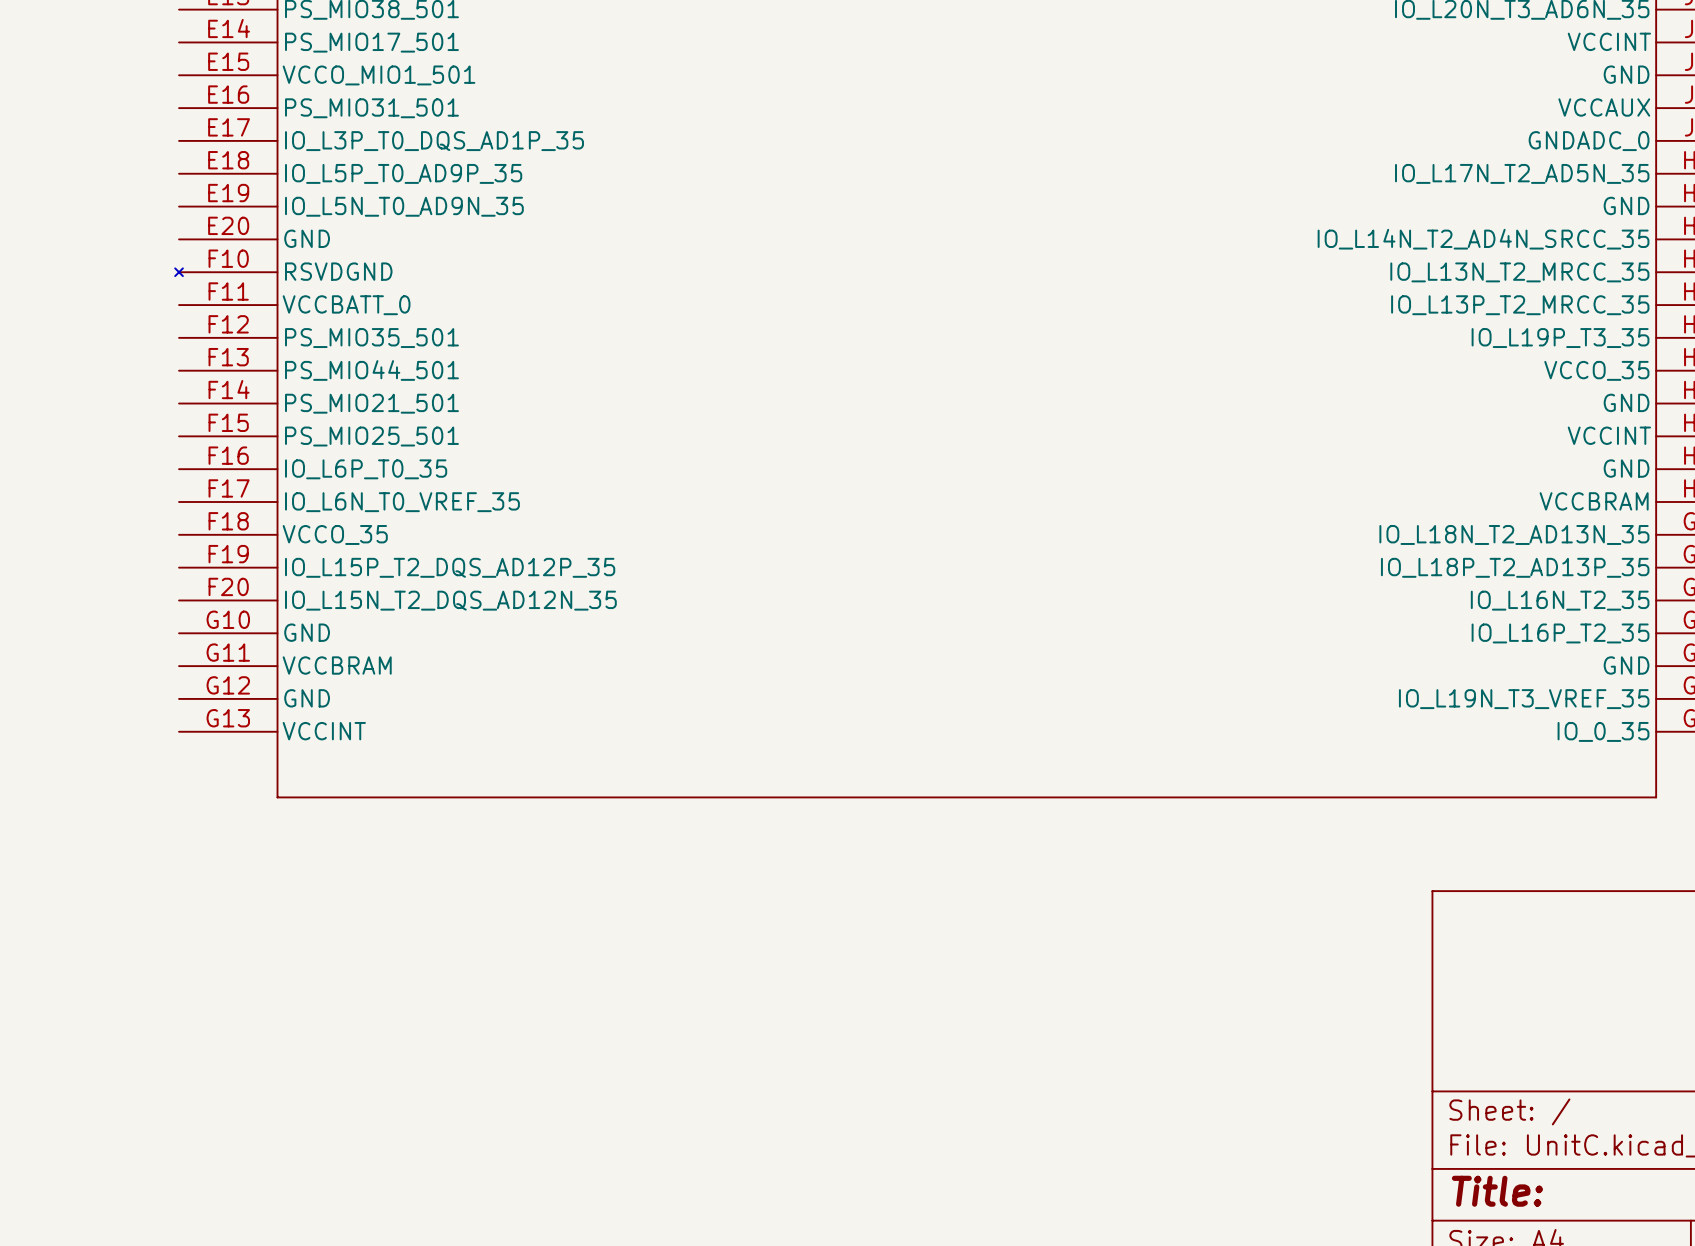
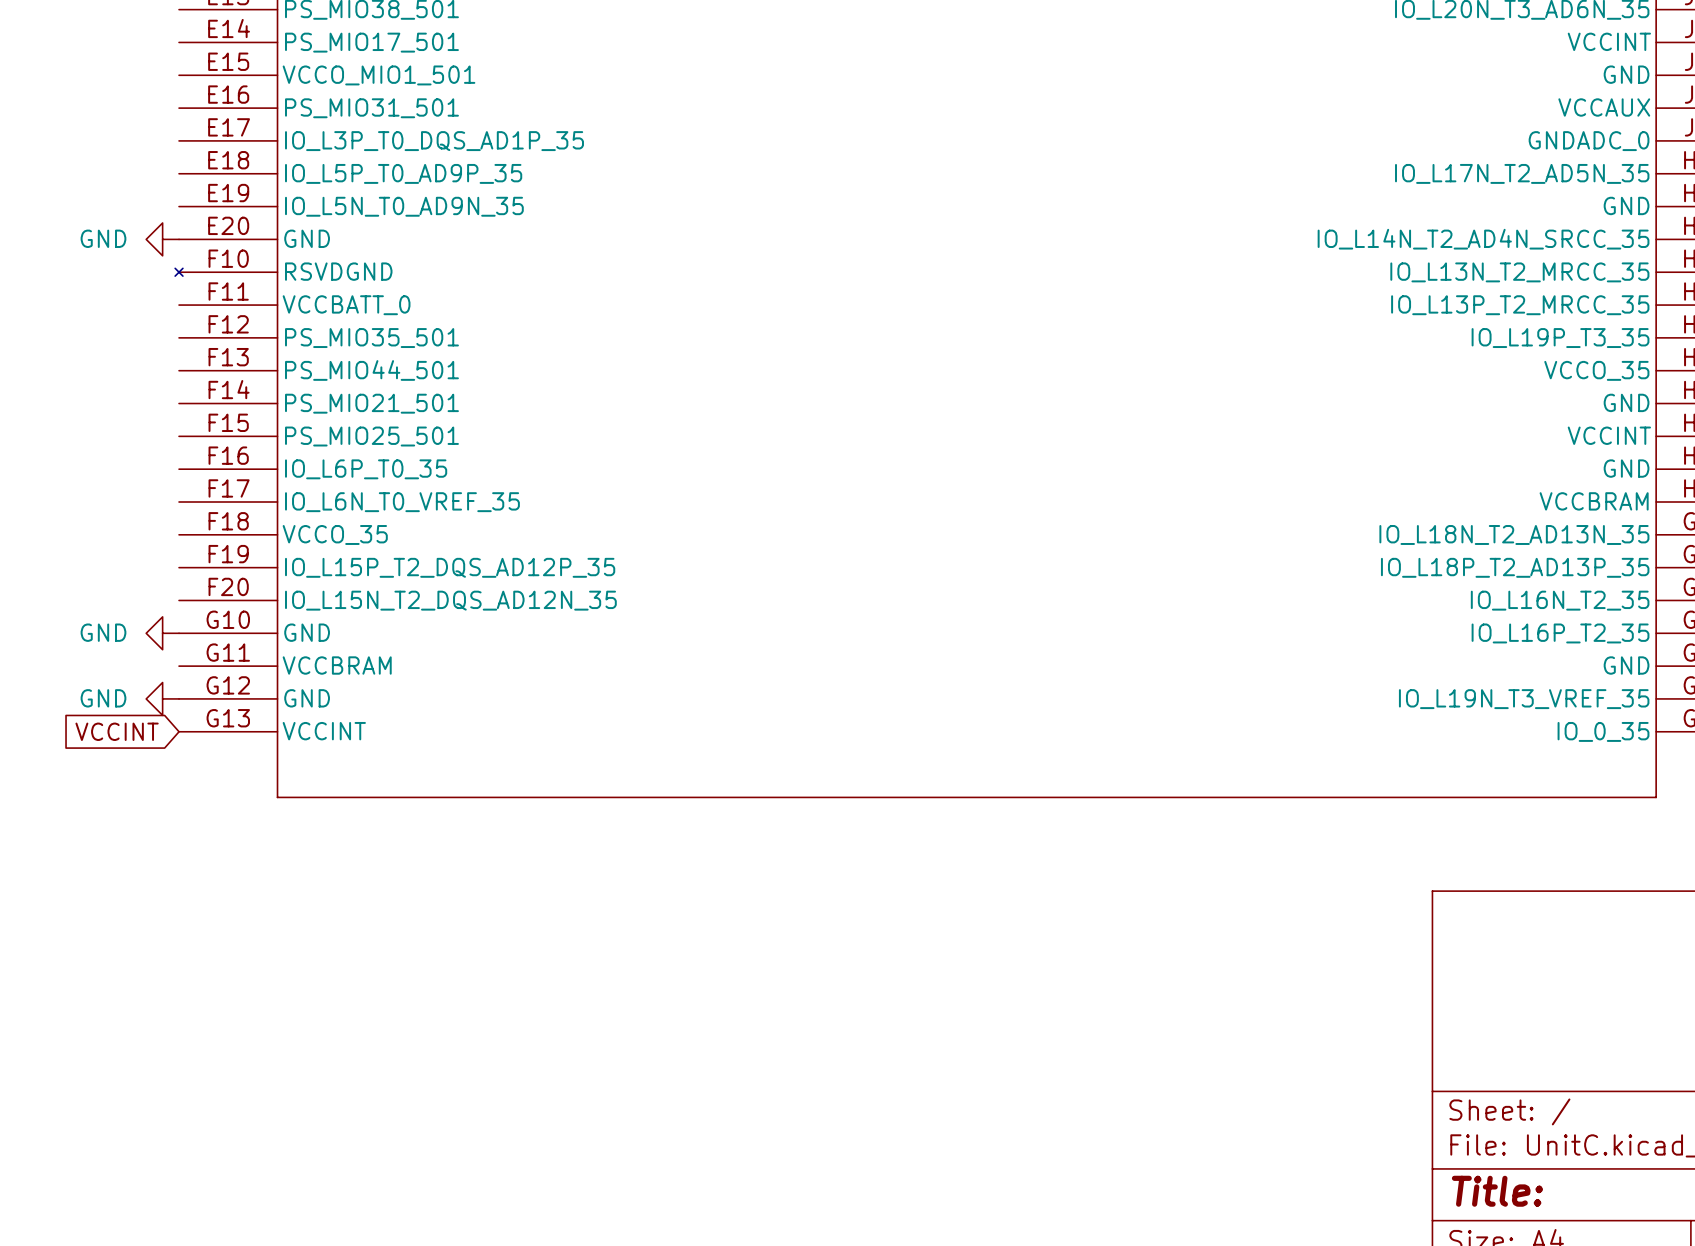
power symbol: none -> GND (162, 239)
power symbol: none -> GND (162, 633)
power symbol: none -> GND (162, 698)
global label: none -> VCCINT (117, 731)

